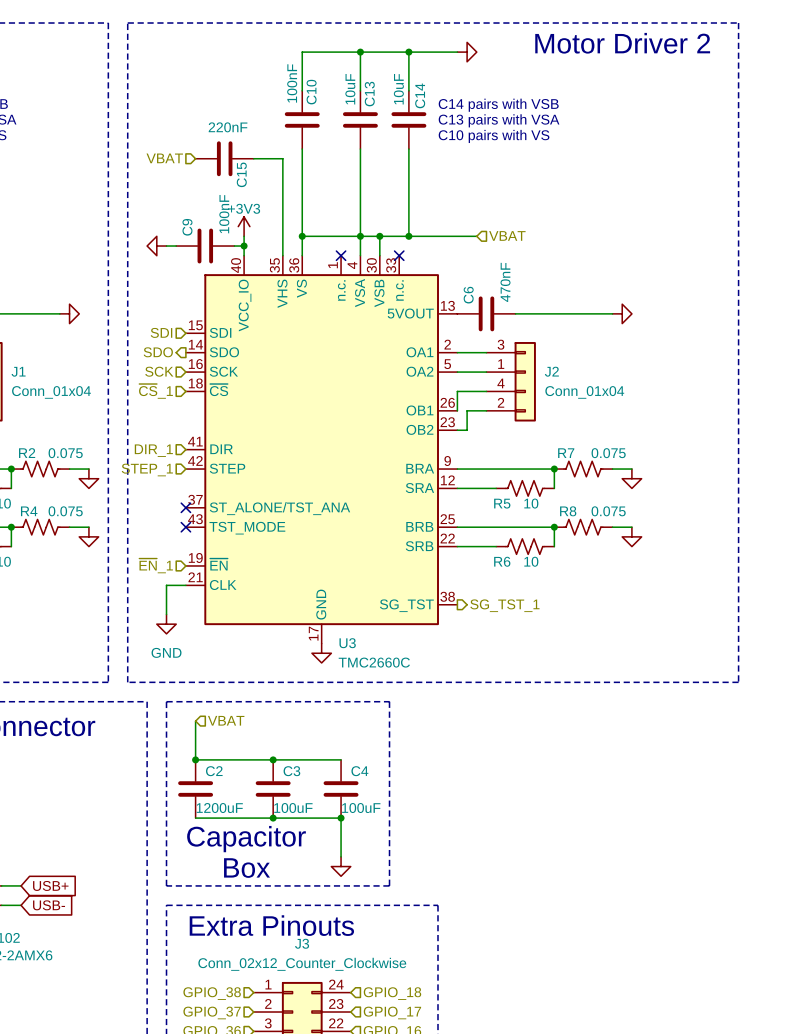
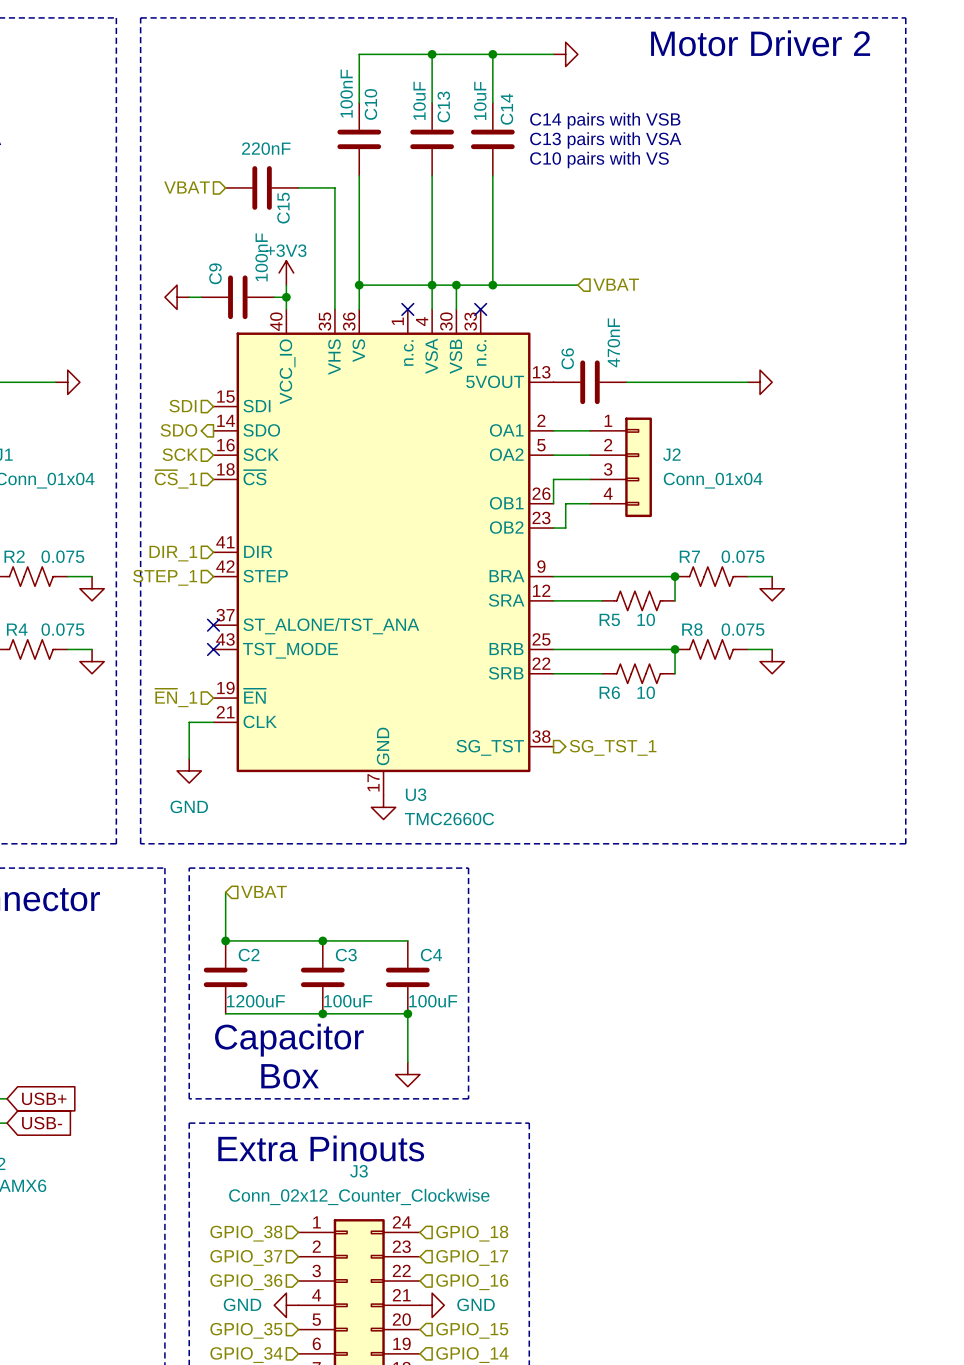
J2 pin number: 3 (500, 344) -> 1 (608, 420)
J2 pin number: 1 (501, 364) -> 2 (608, 445)
J2 pin number: 4 (500, 383) -> 3 (608, 469)
J2 pin number: 2 (501, 402) -> 4 (608, 493)

